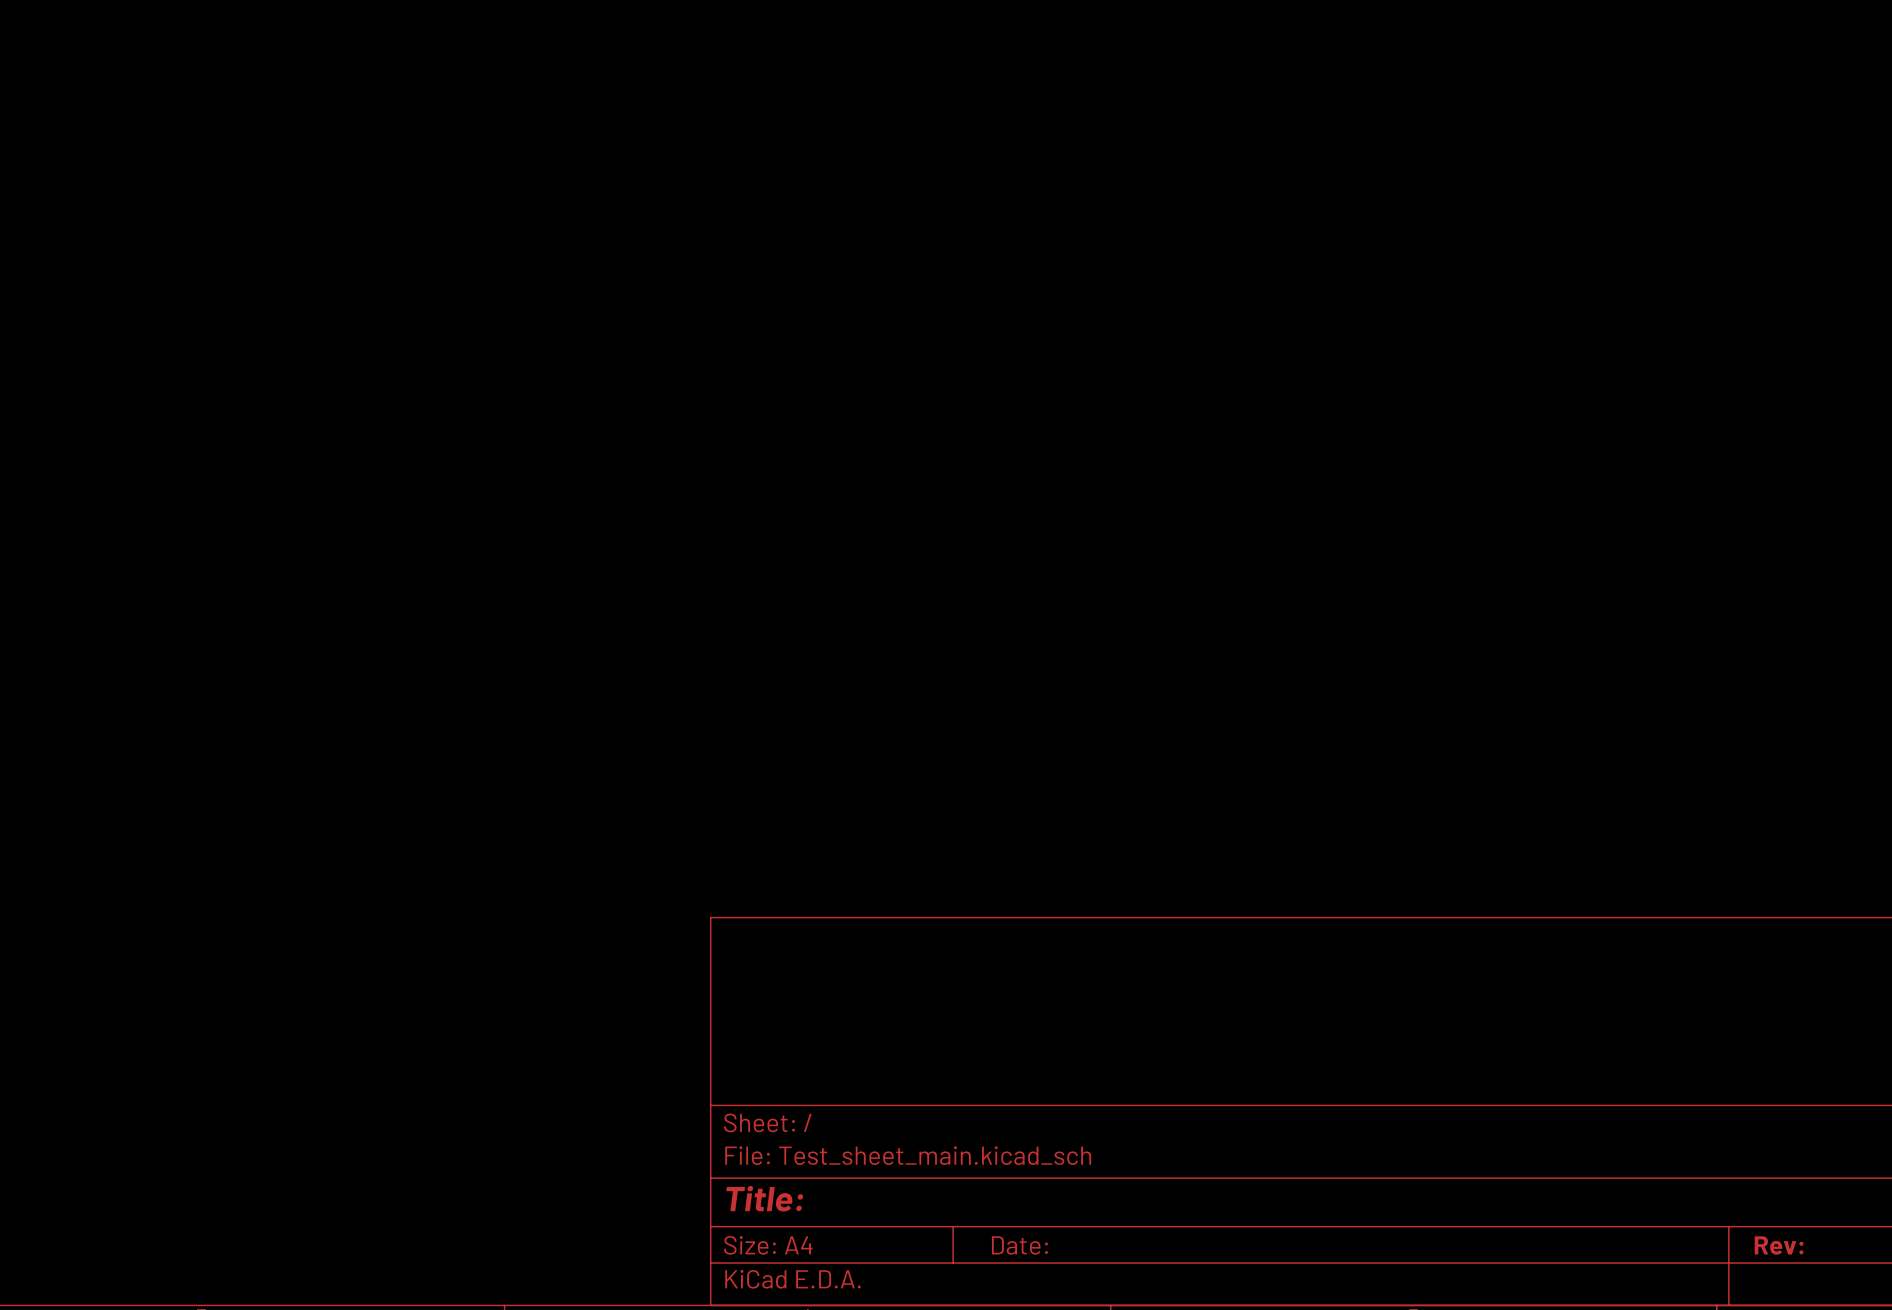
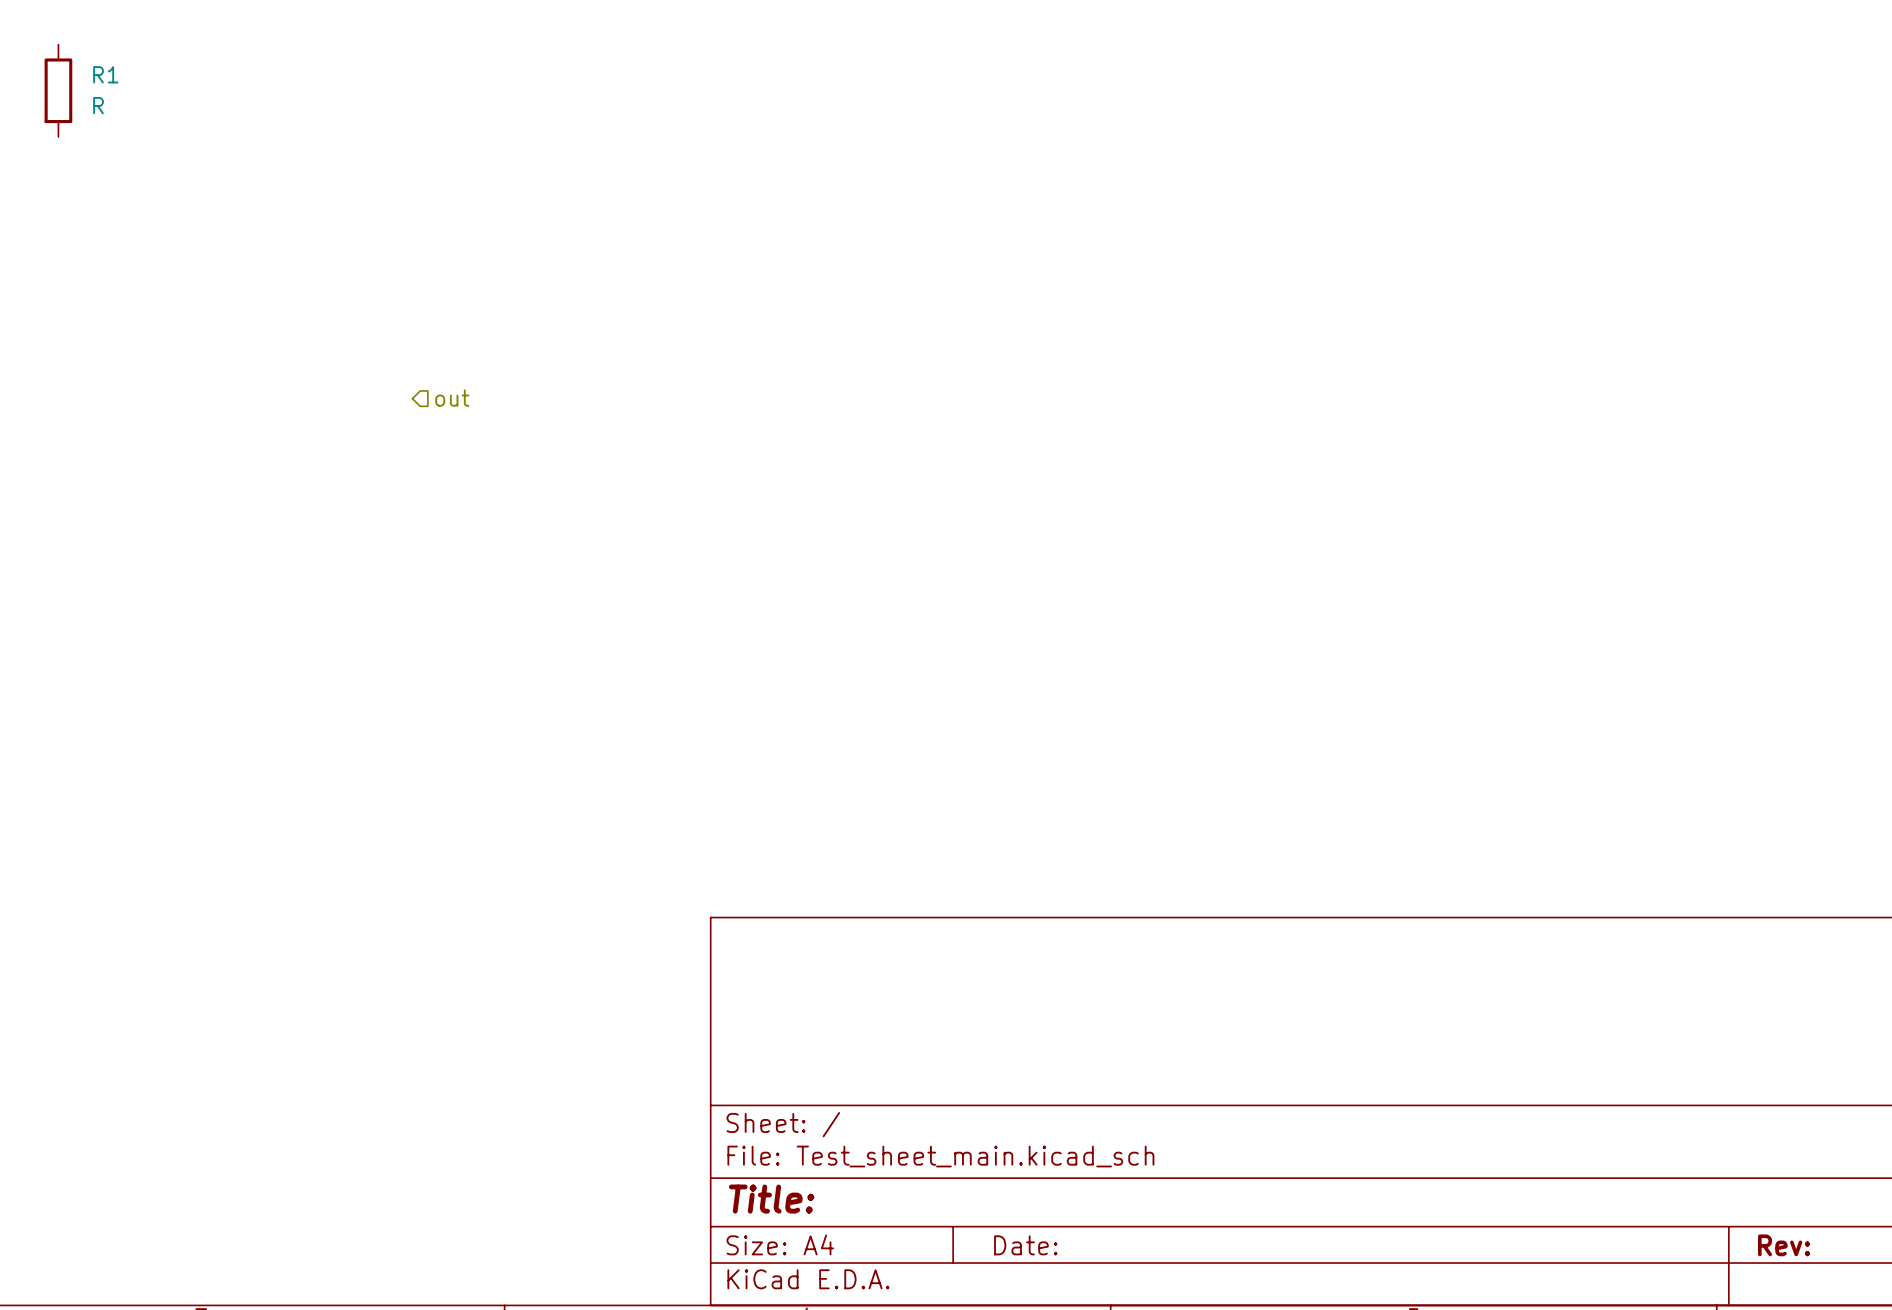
R1: none -> R (58, 90)
hierarchical label: none -> out (452, 398)

